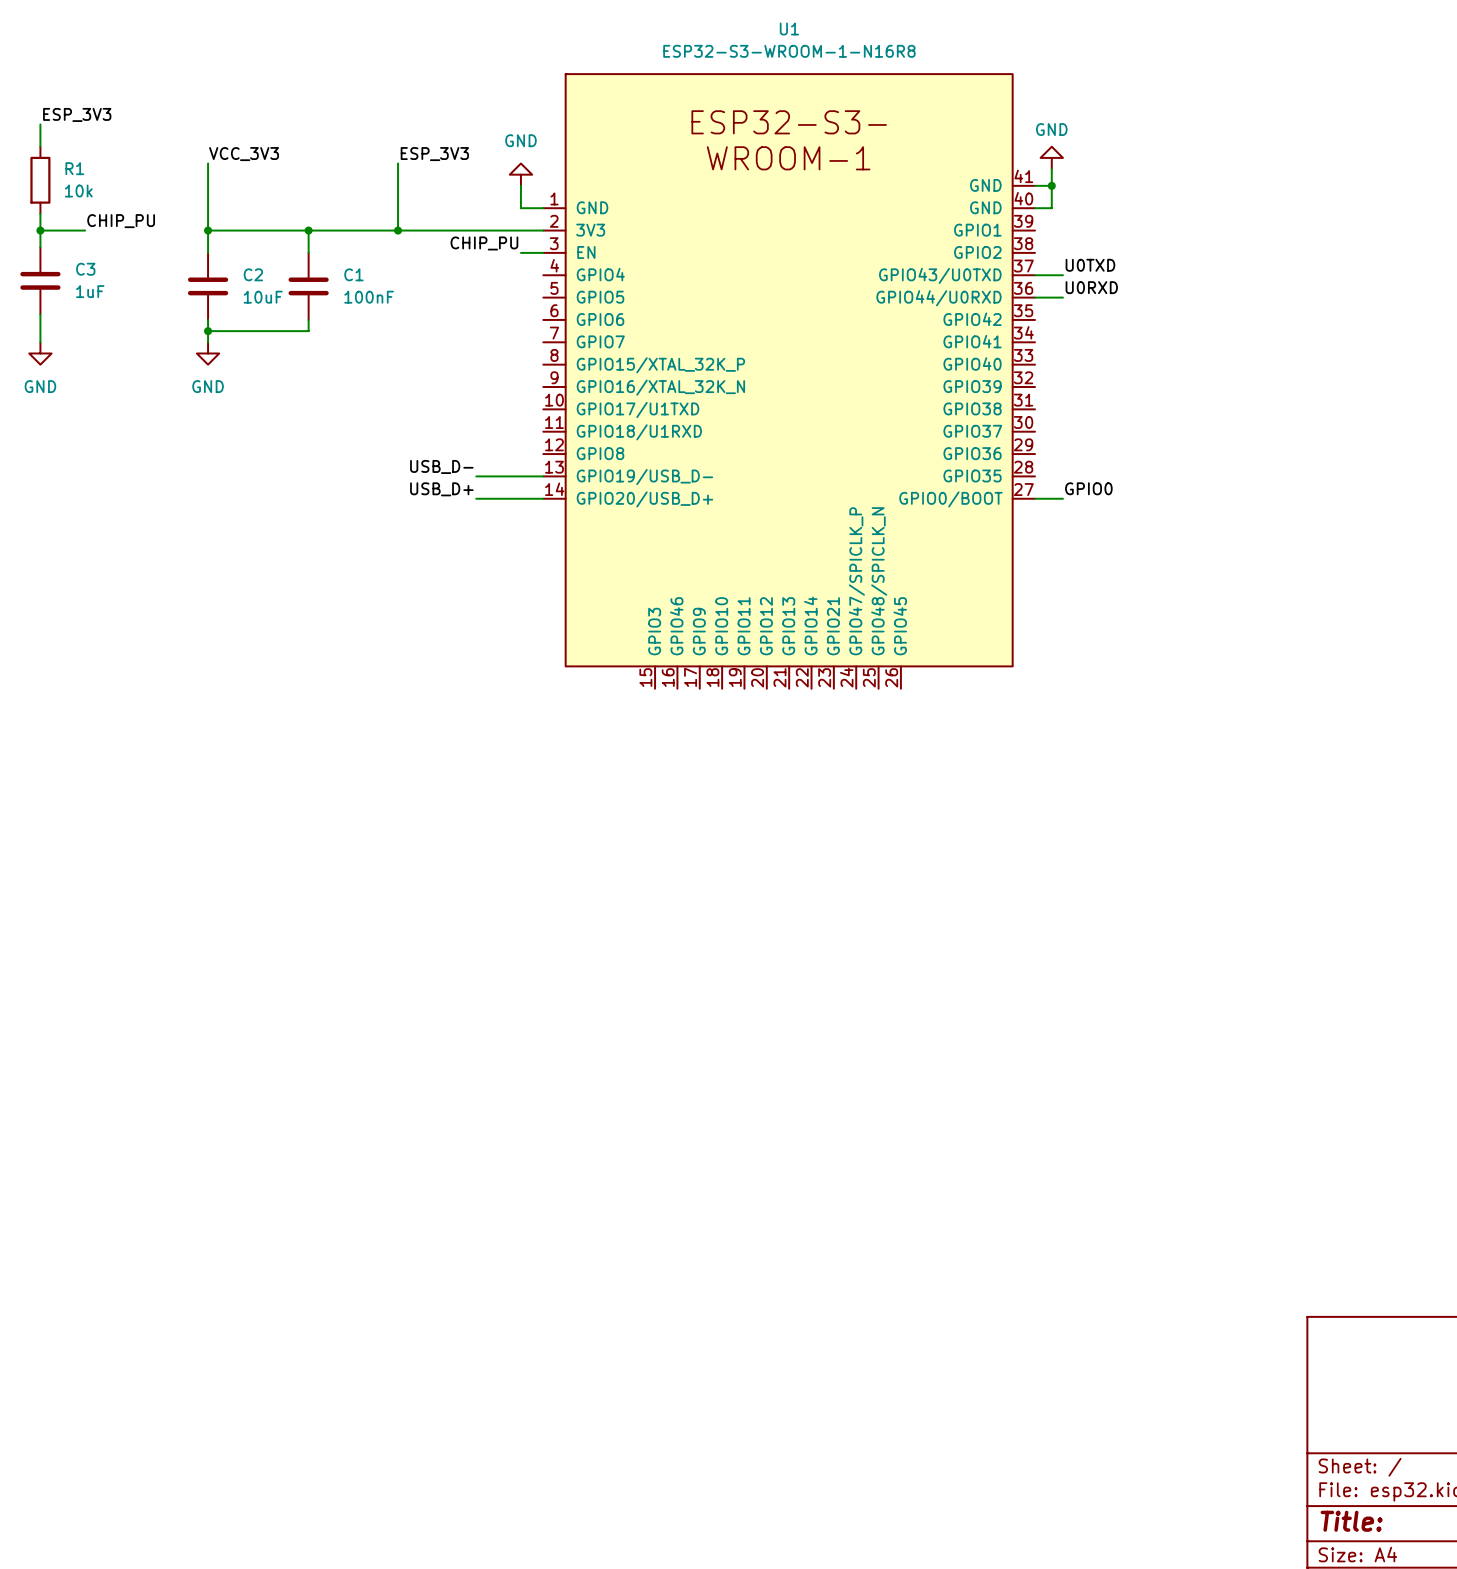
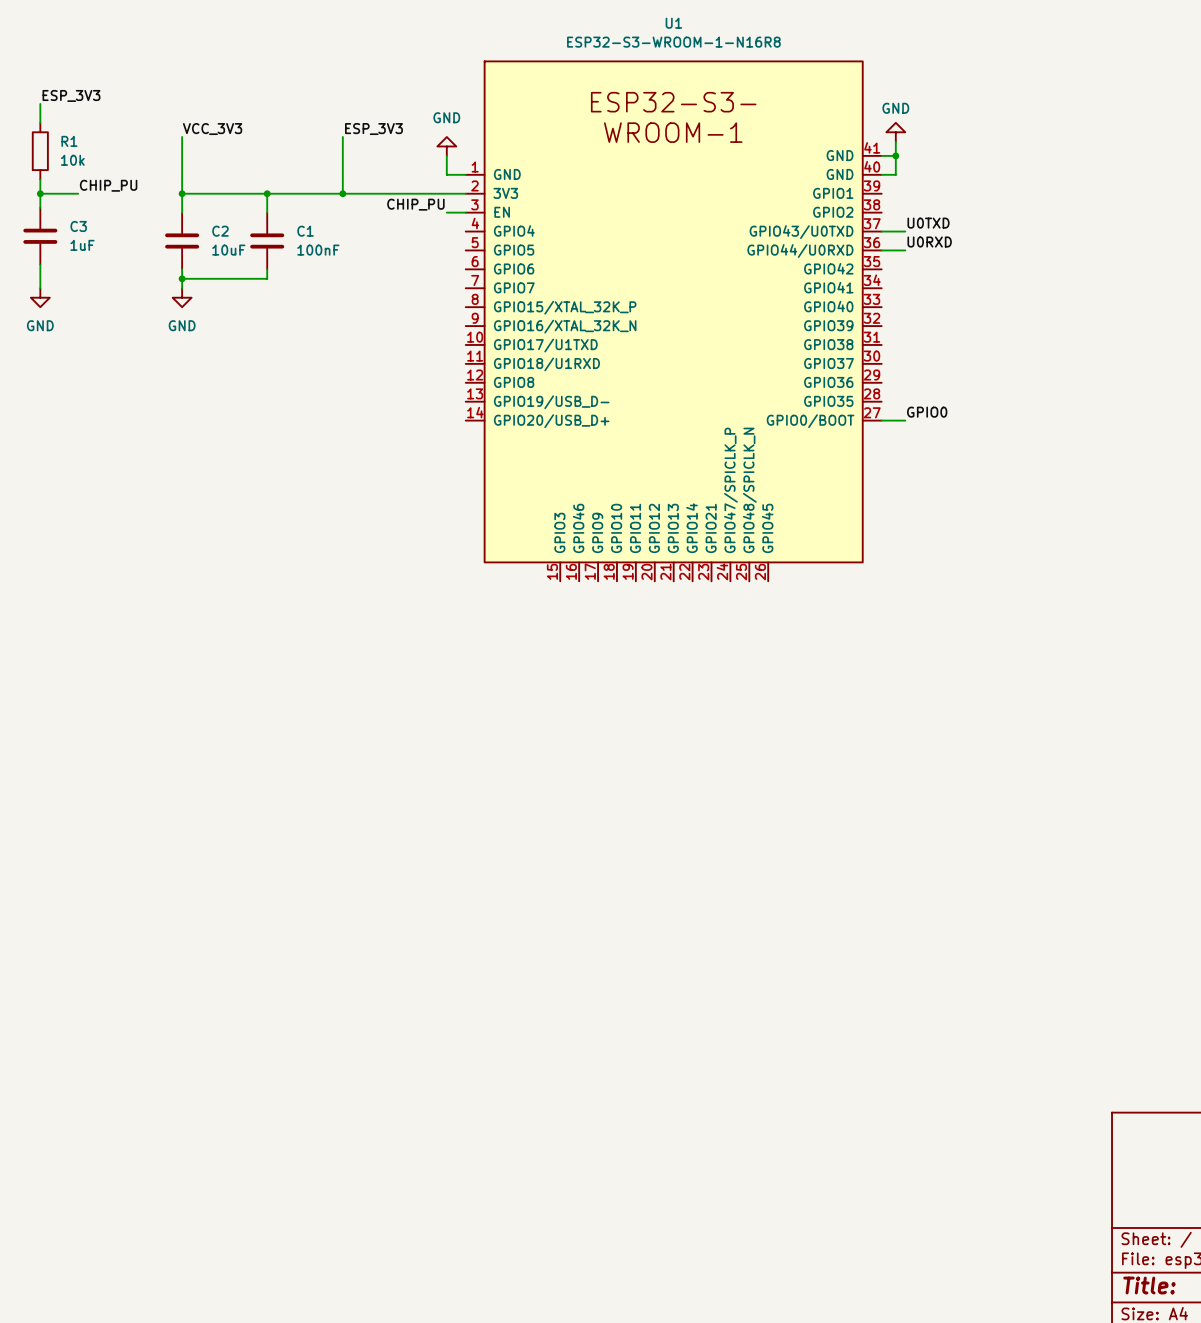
label: USB_D- (441, 466) -> none
wire: (476, 476) (543, 476) -> none
label: USB_D+ (441, 489) -> none
wire: (476, 498) (543, 498) -> none

